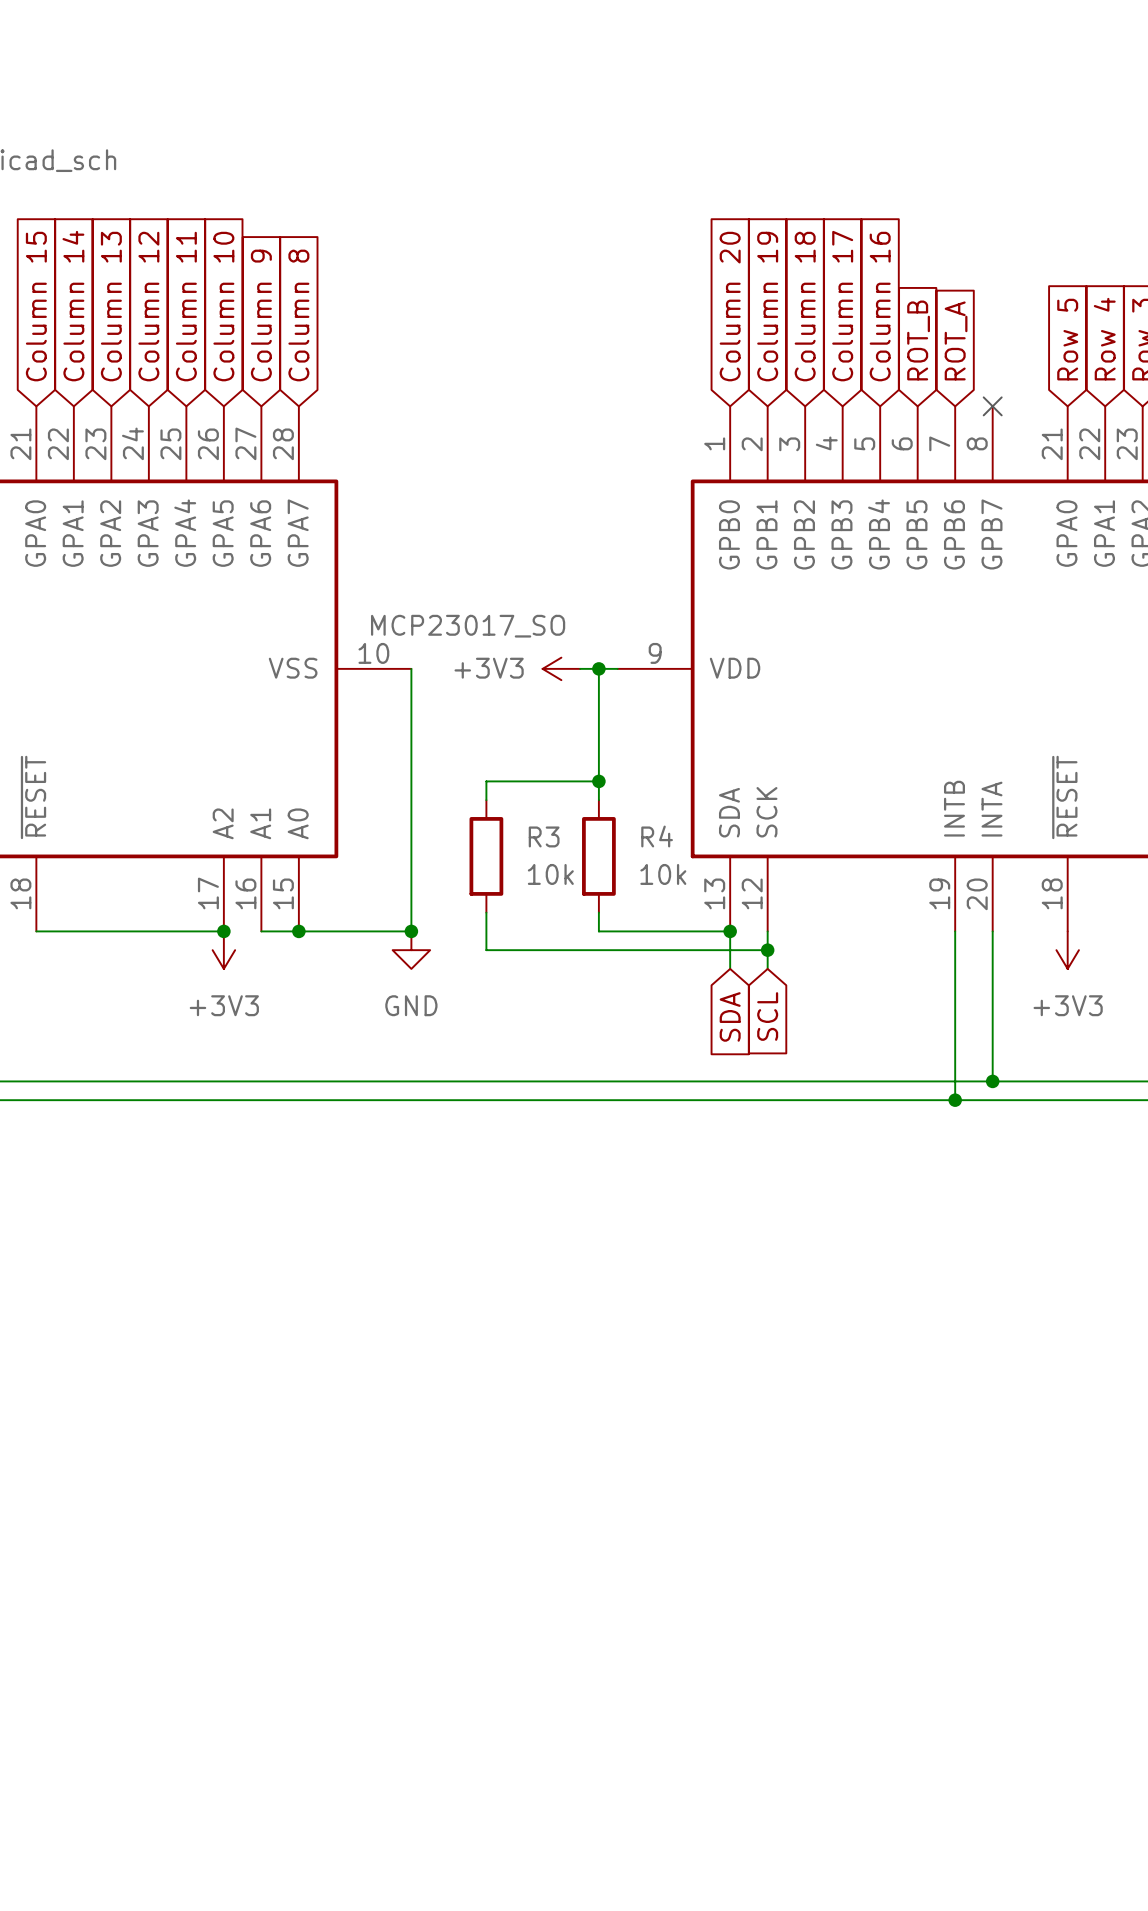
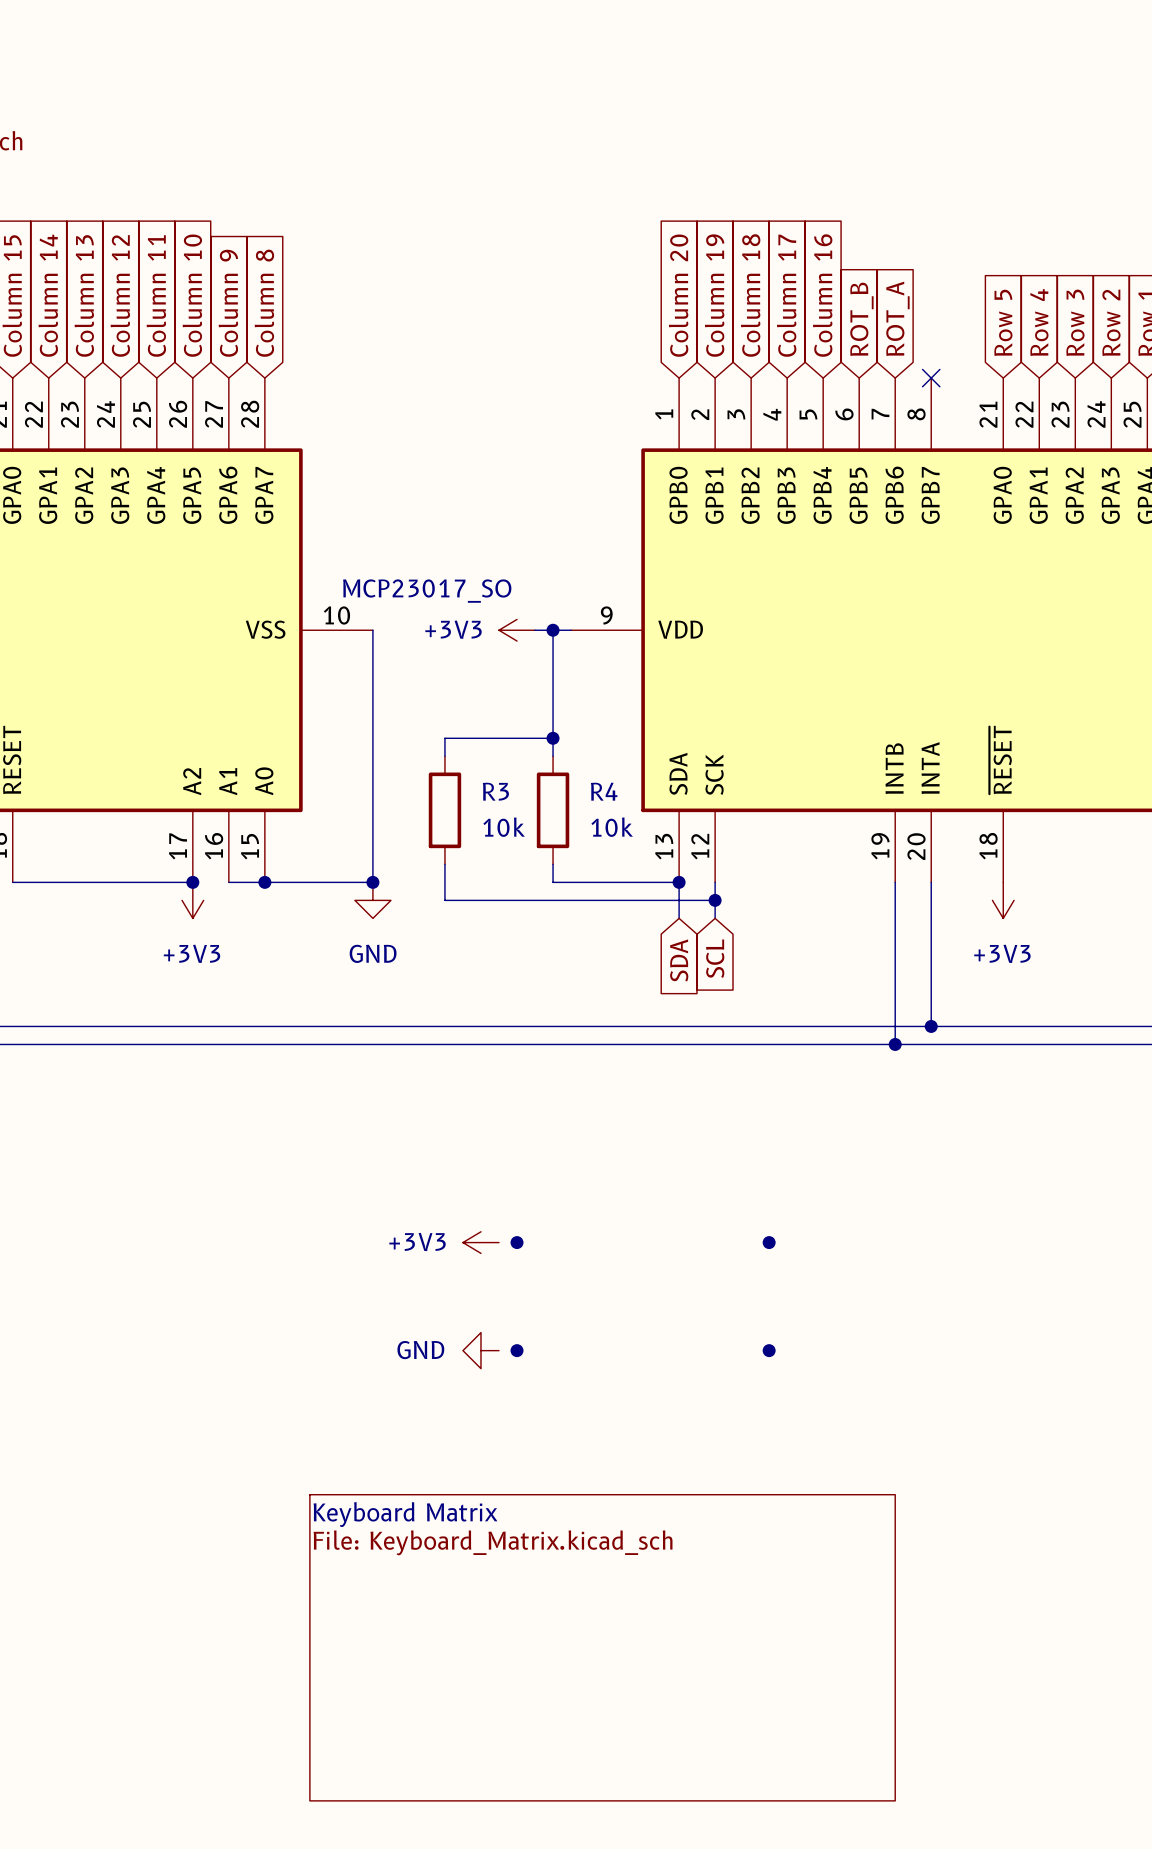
power symbol: none -> +3V3 (480, 1242)
junction: none -> (517, 1242)
junction: none -> (769, 1242)
power symbol: none -> GND (480, 1350)
junction: none -> (517, 1350)
junction: none -> (769, 1350)
sheet Keyboard Matrix: none -> File: Keyboard_Matrix.kicad_sch (602, 1647)

